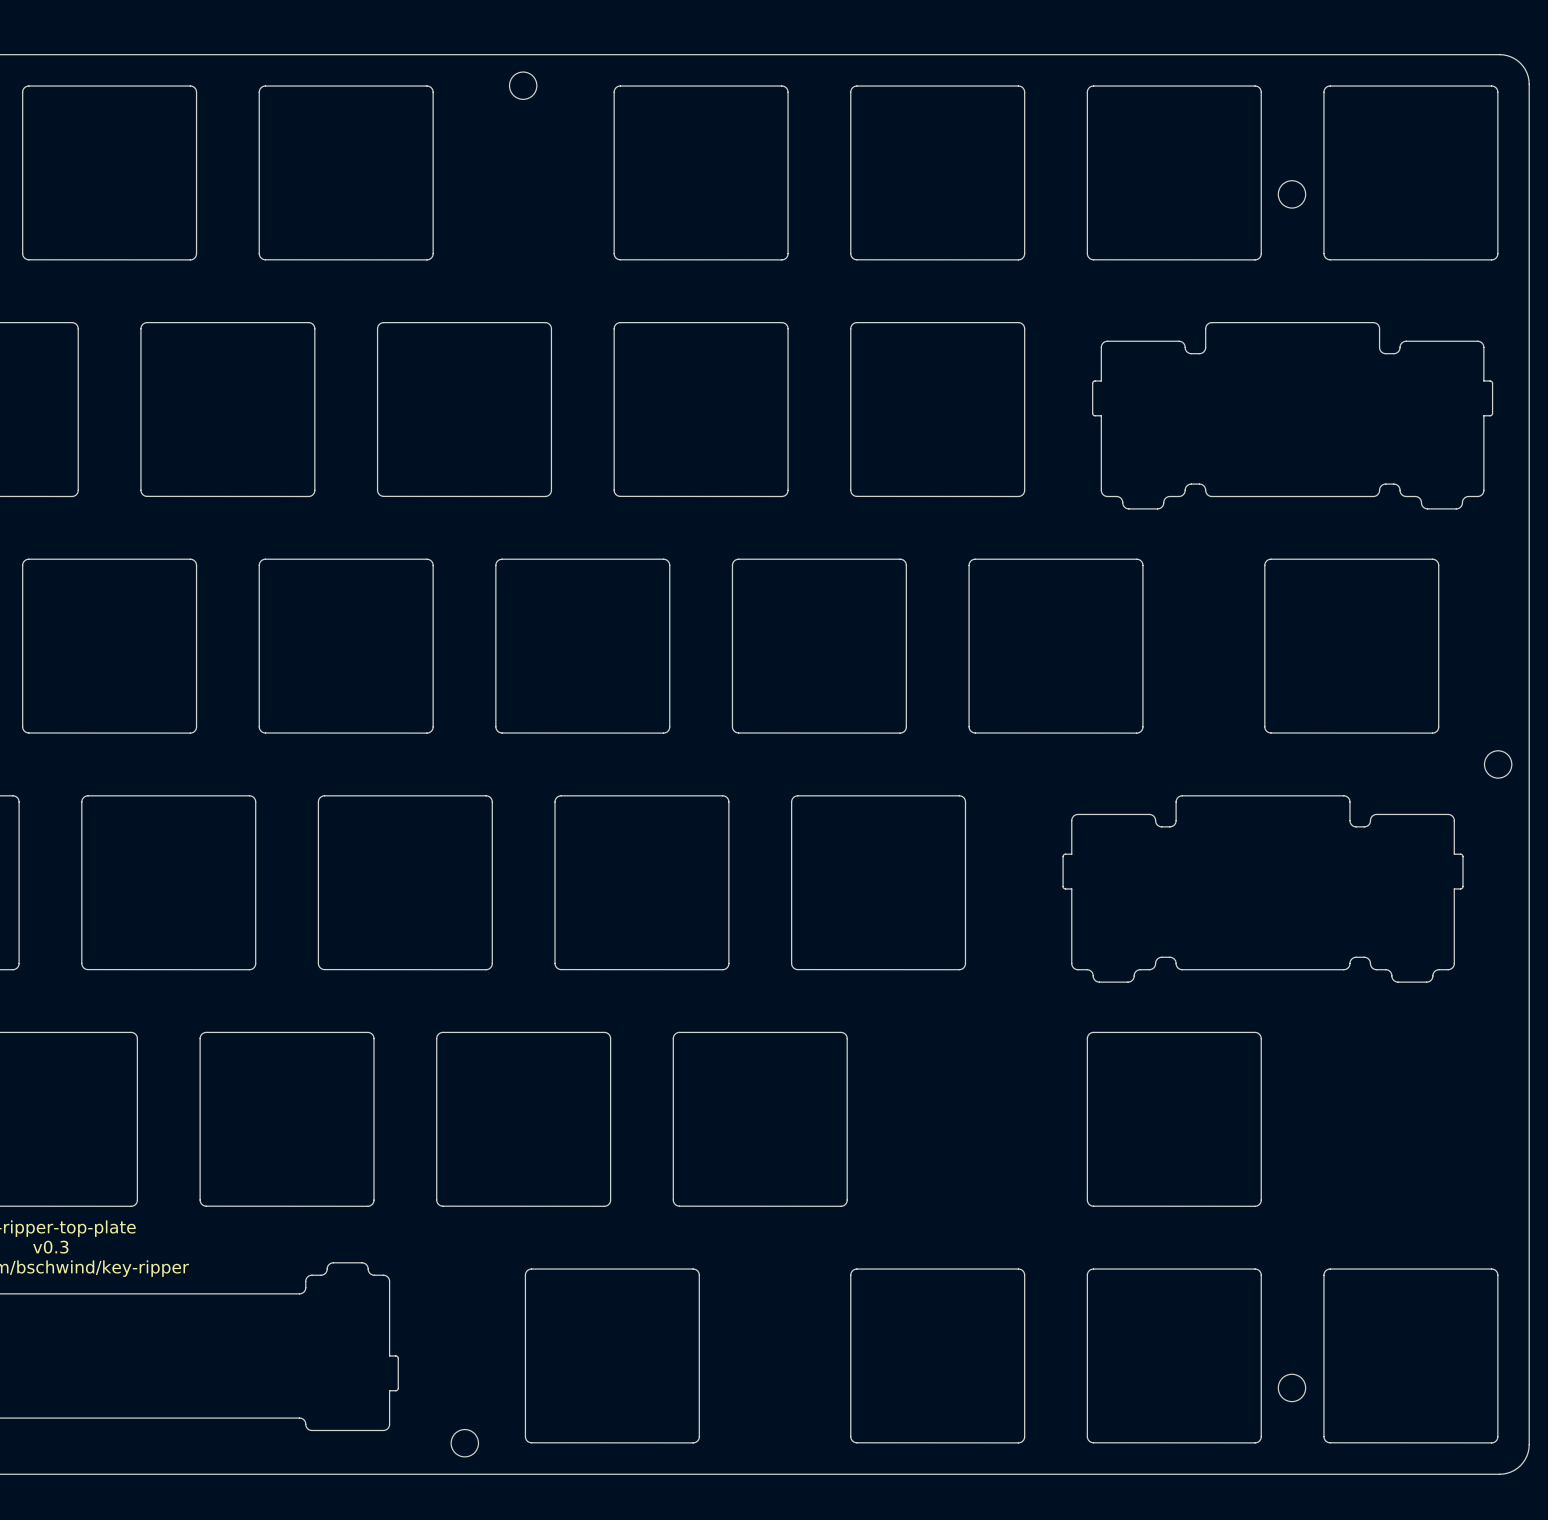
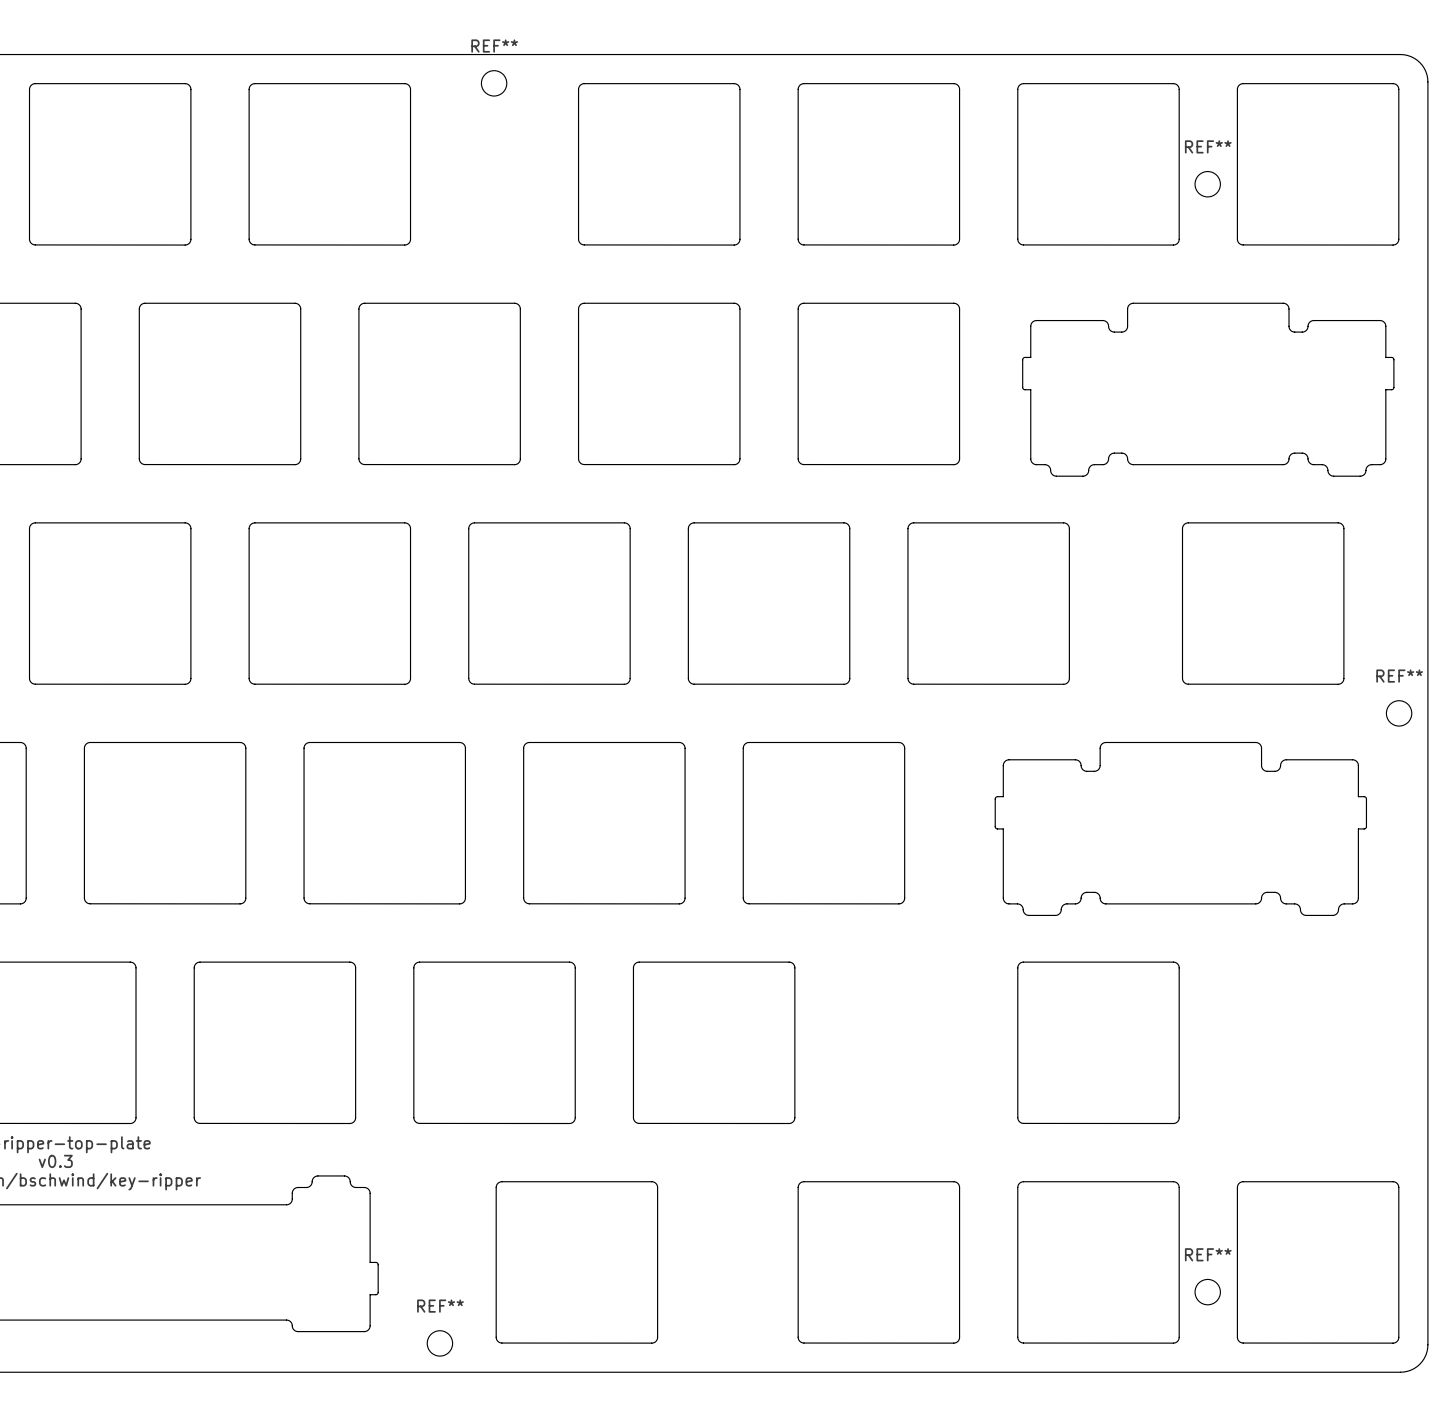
REF** name: none -> REF** (494, 46)
REF** name: none -> REF** (1208, 146)
REF** name: none -> REF** (1399, 676)
REF** name: none -> REF** (1208, 1254)
REF** name: none -> REF** (440, 1306)

